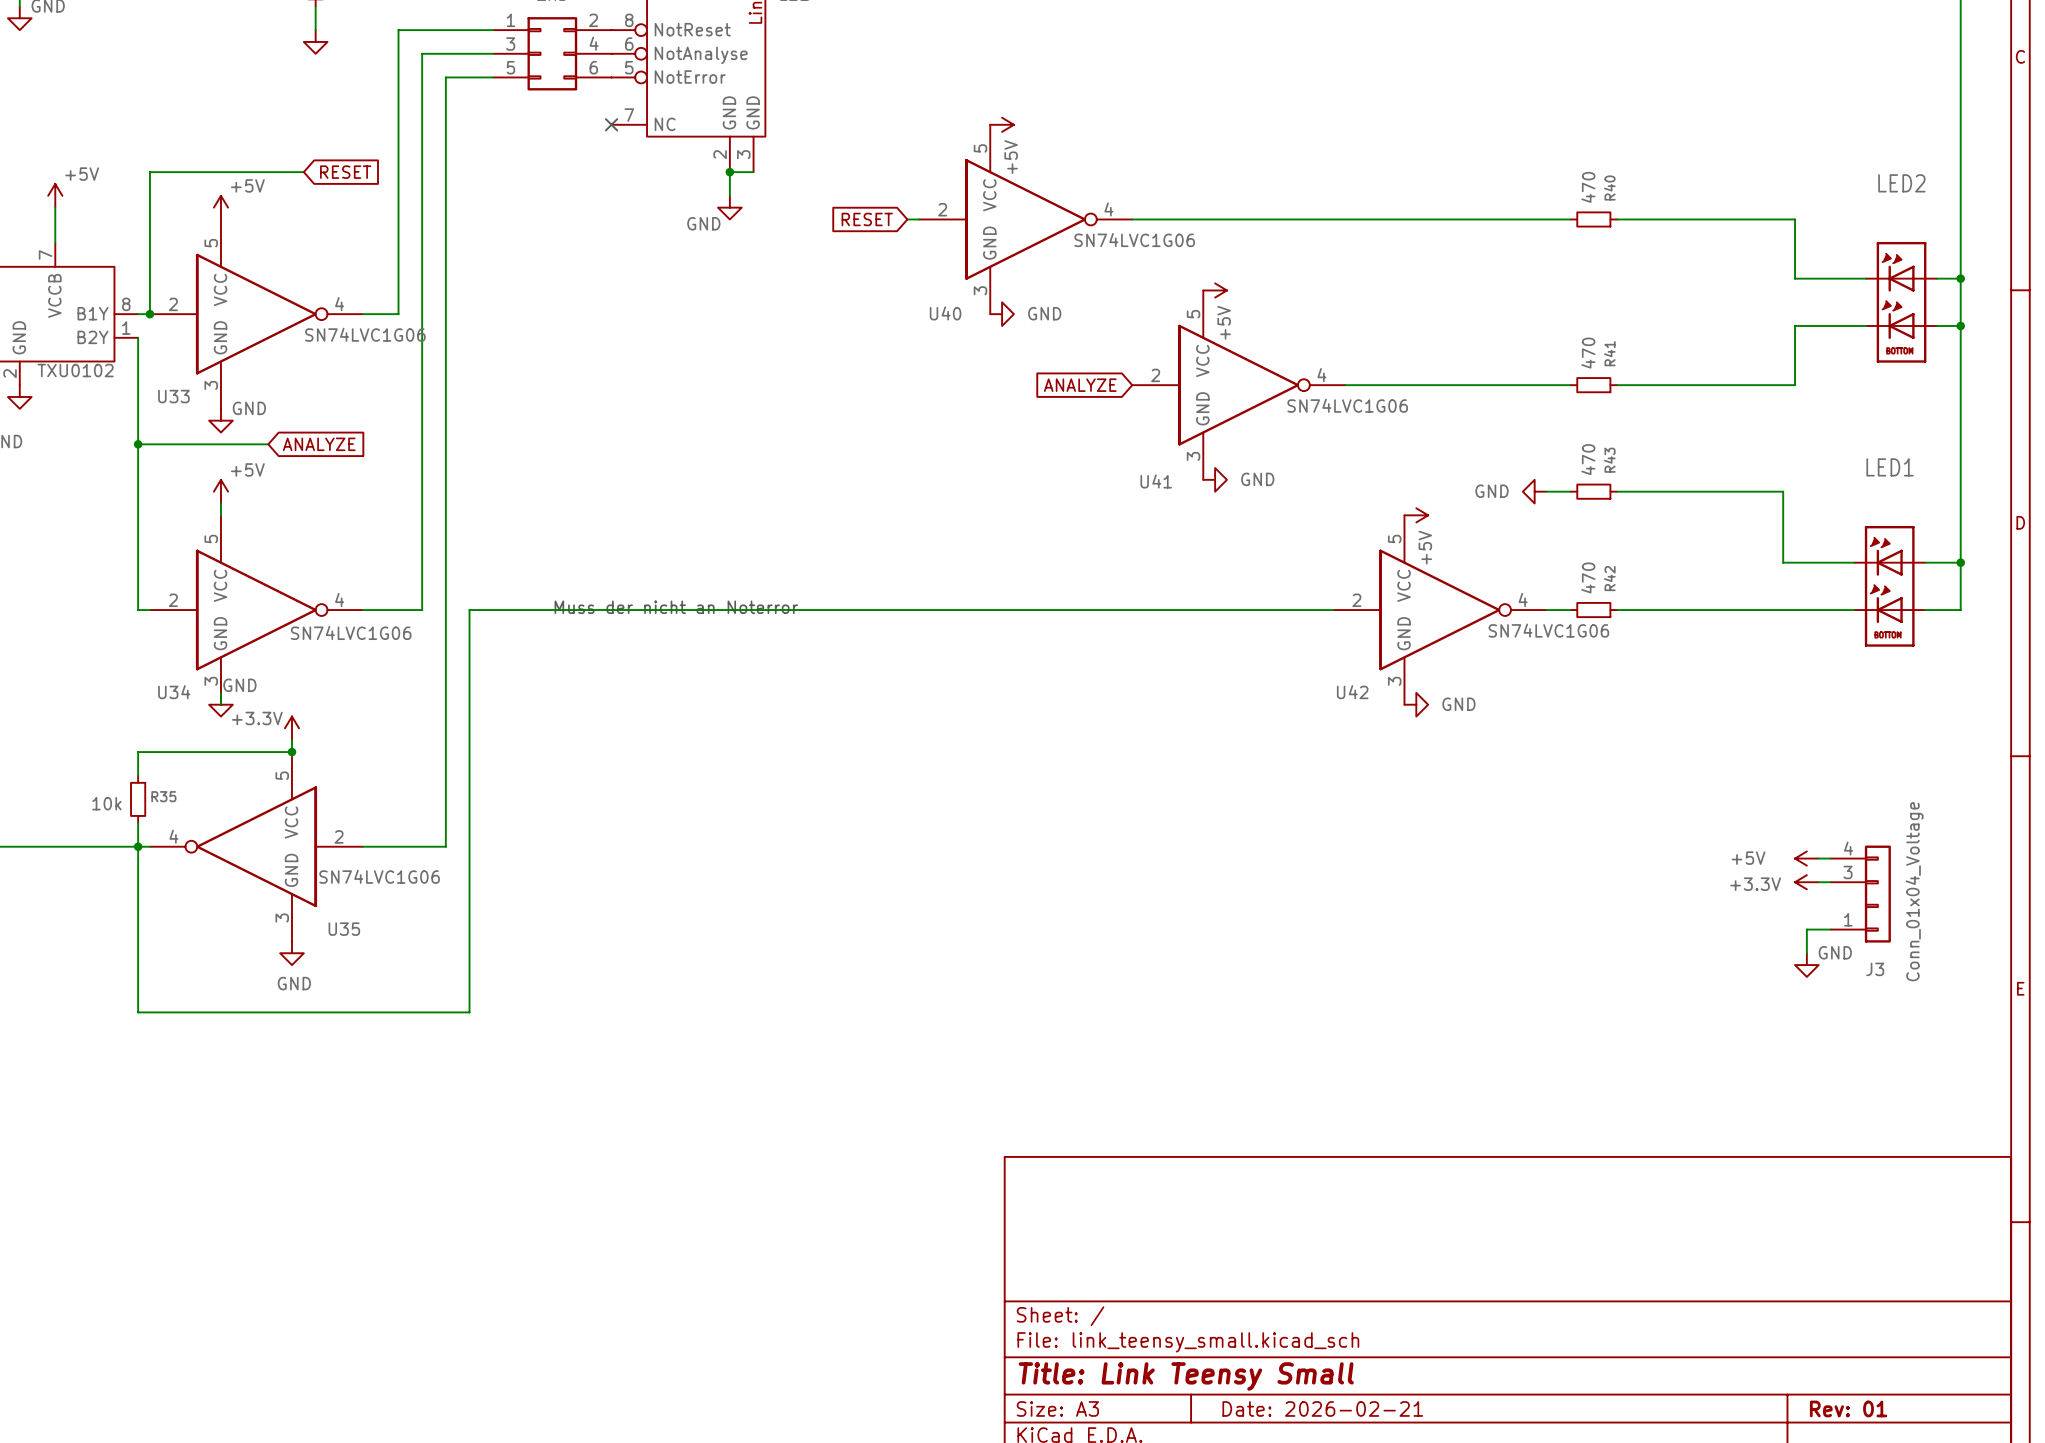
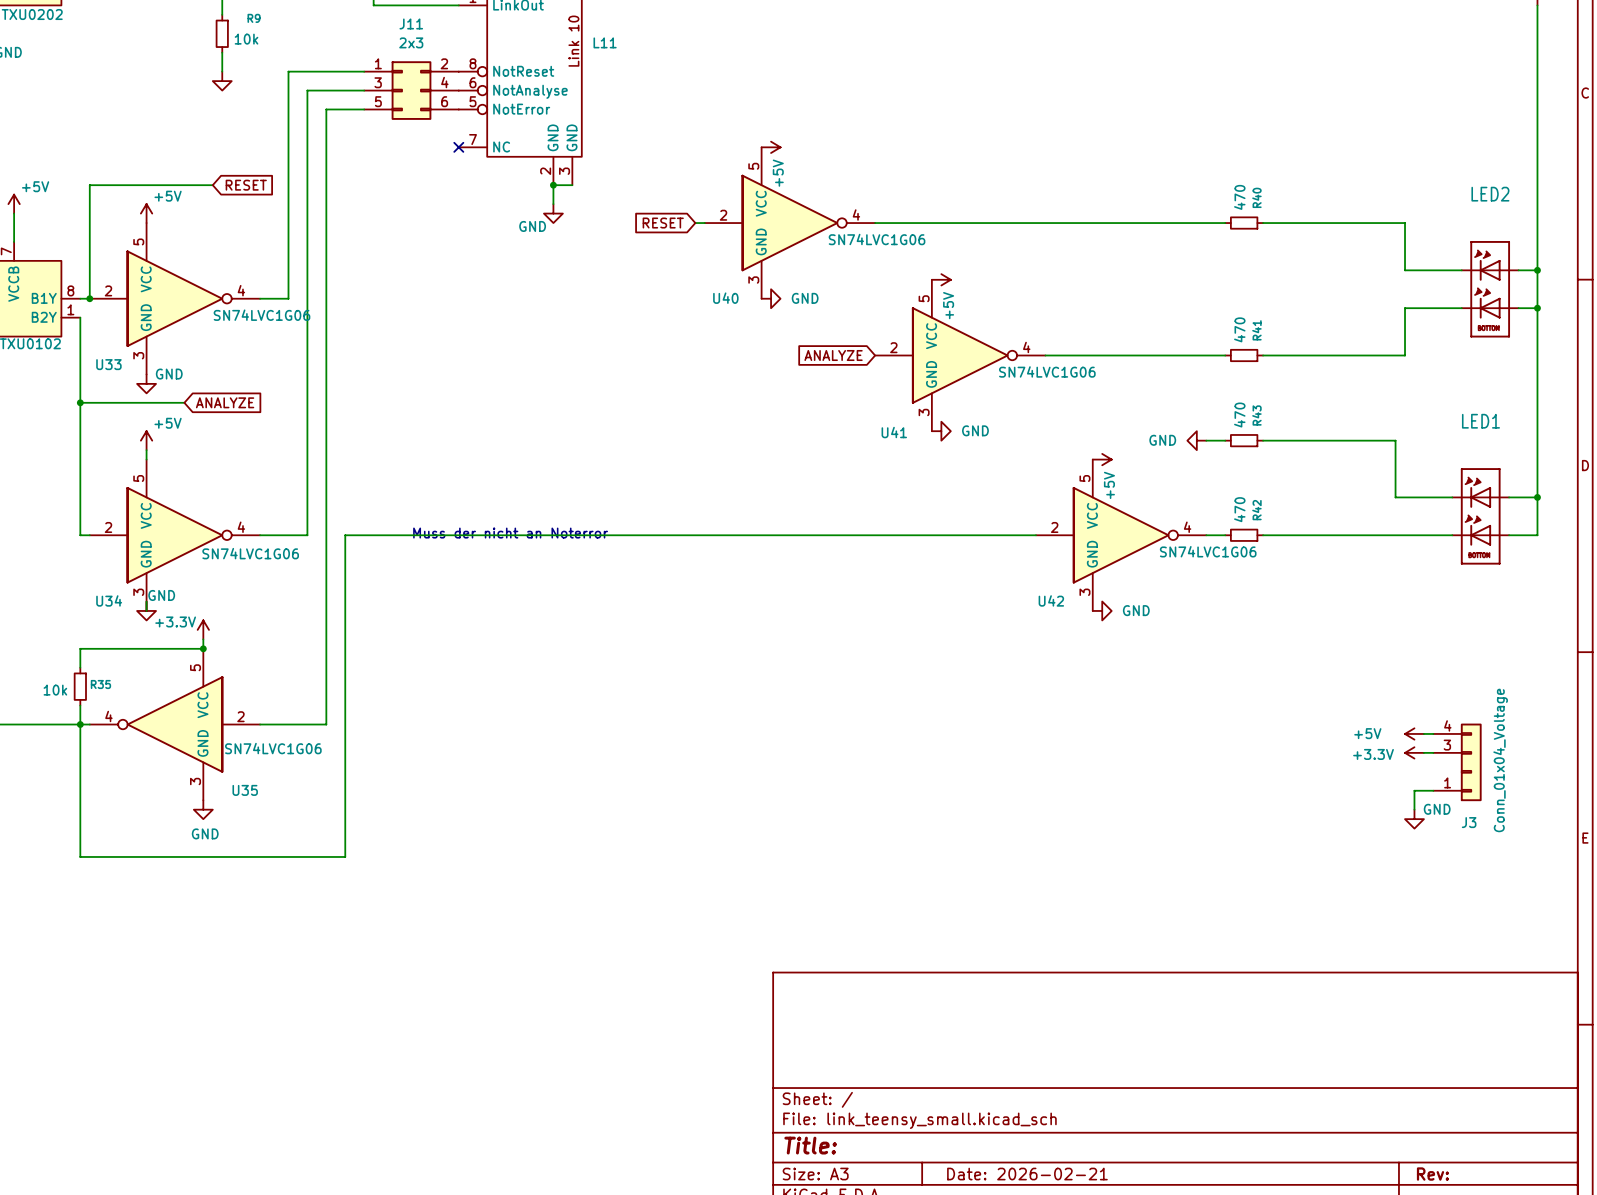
title block: Title: Link Teensy Small (1186, 1376) -> Title: (810, 1145)
title block: Rev: 01 (1848, 1408) -> Rev: (1432, 1174)

